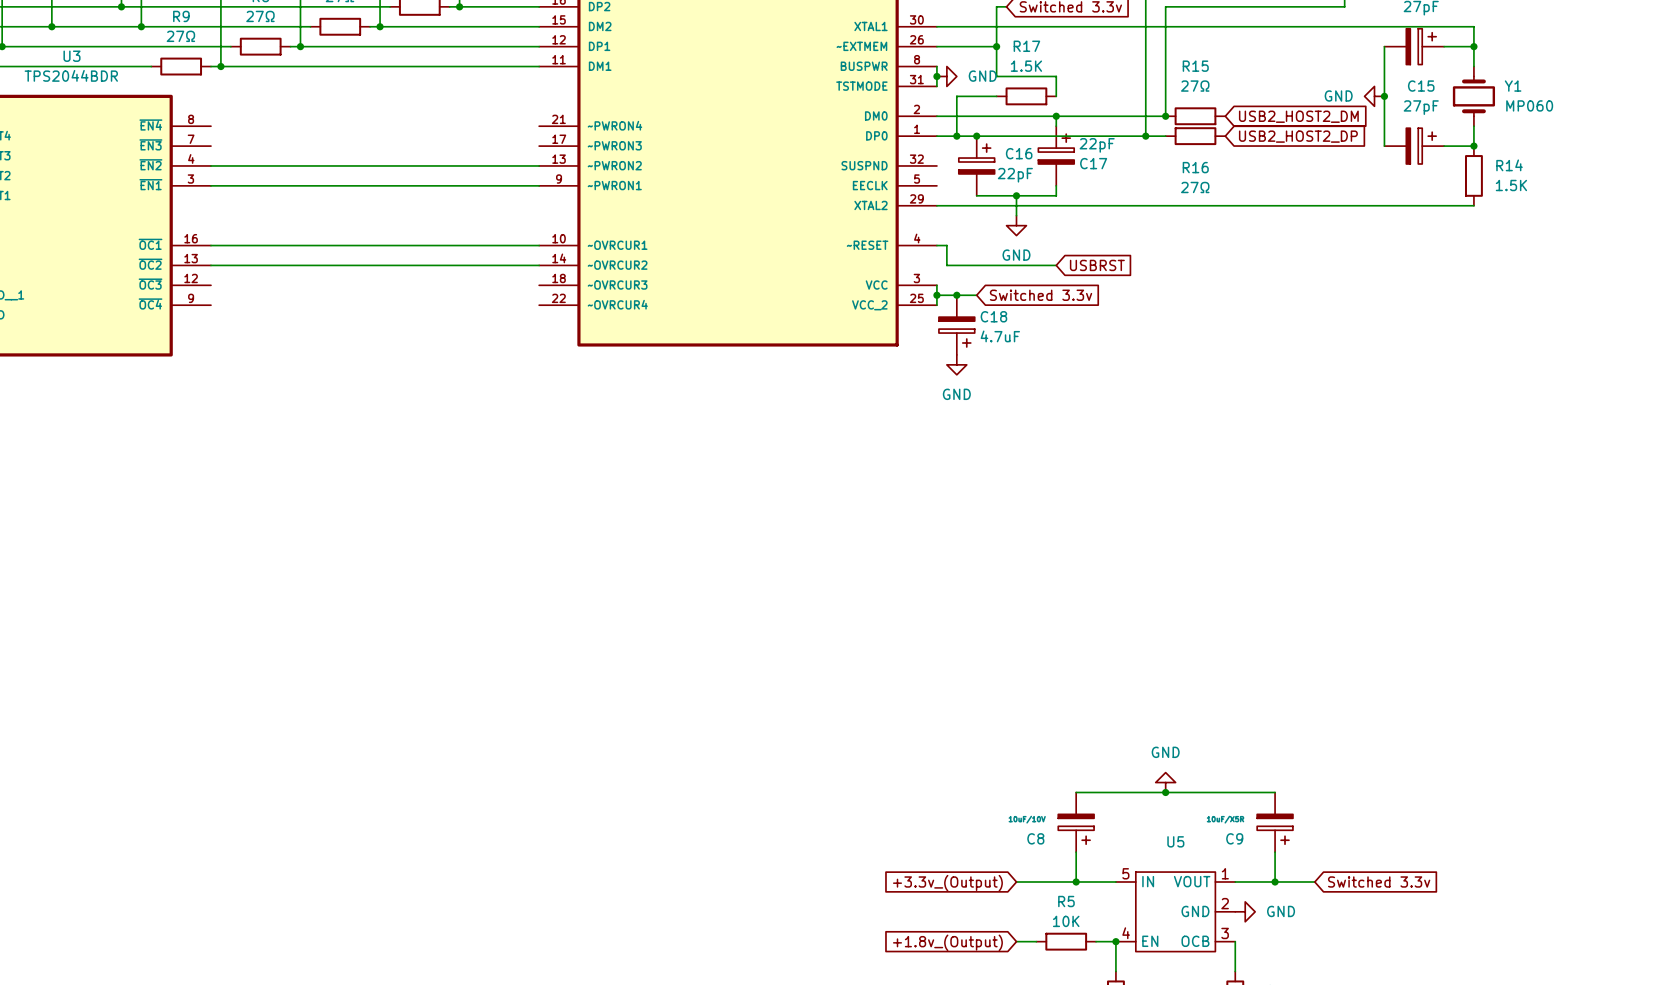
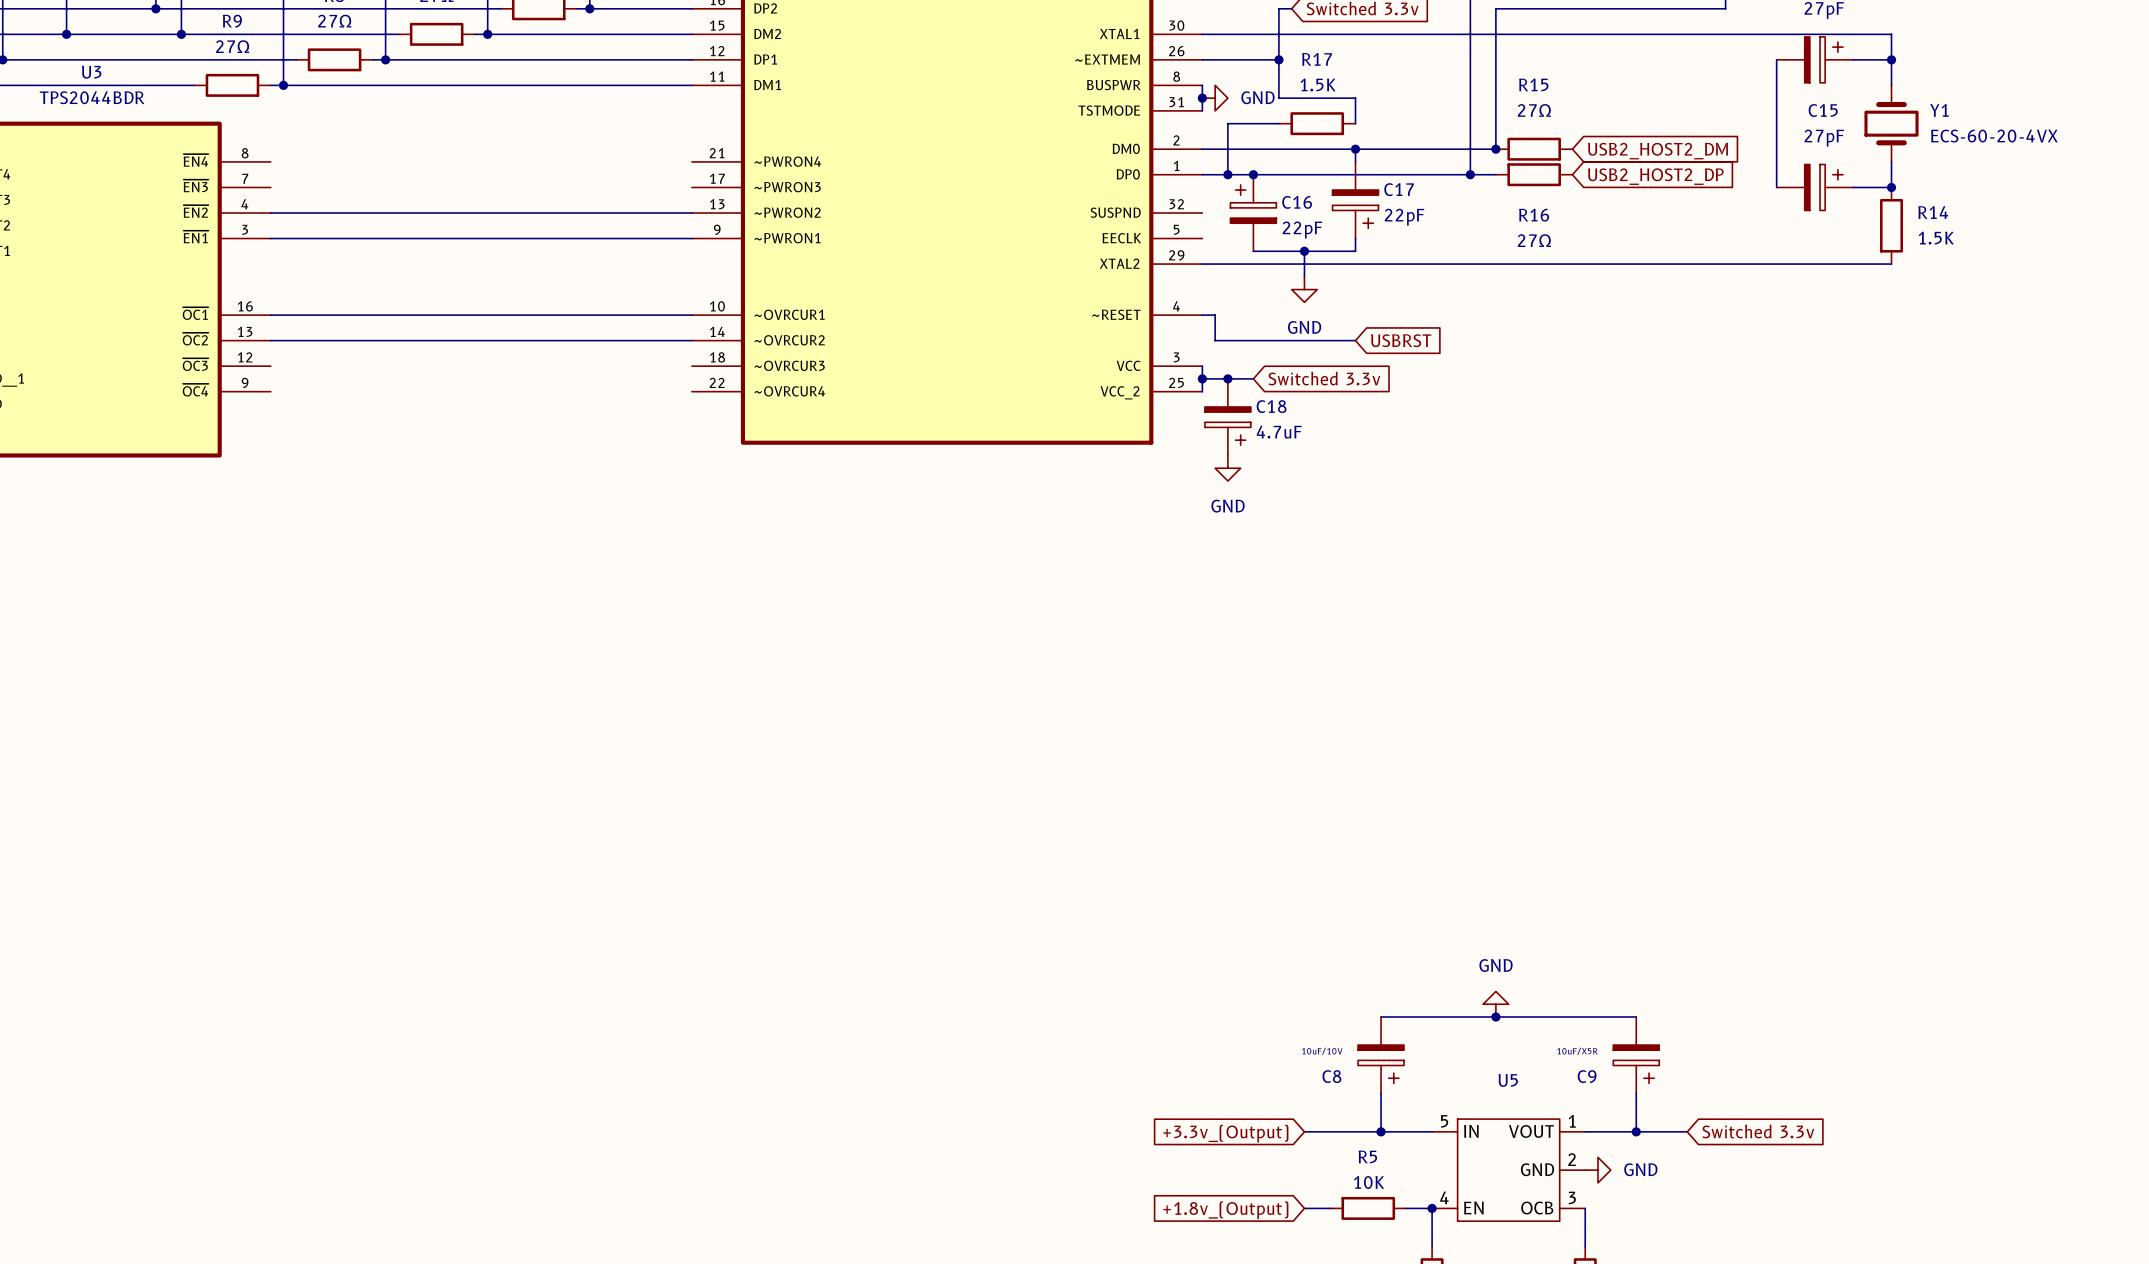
power symbol: GND (1374, 96) -> none
junction: (1384, 96) -> none
Y1 value: MP060 (1529, 105) -> ECS-60-20-4VX (1994, 136)
C17 flip: as is (1056, 149) -> up-down (1355, 209)
C16 flip: as is (976, 159) -> left-right (1253, 204)

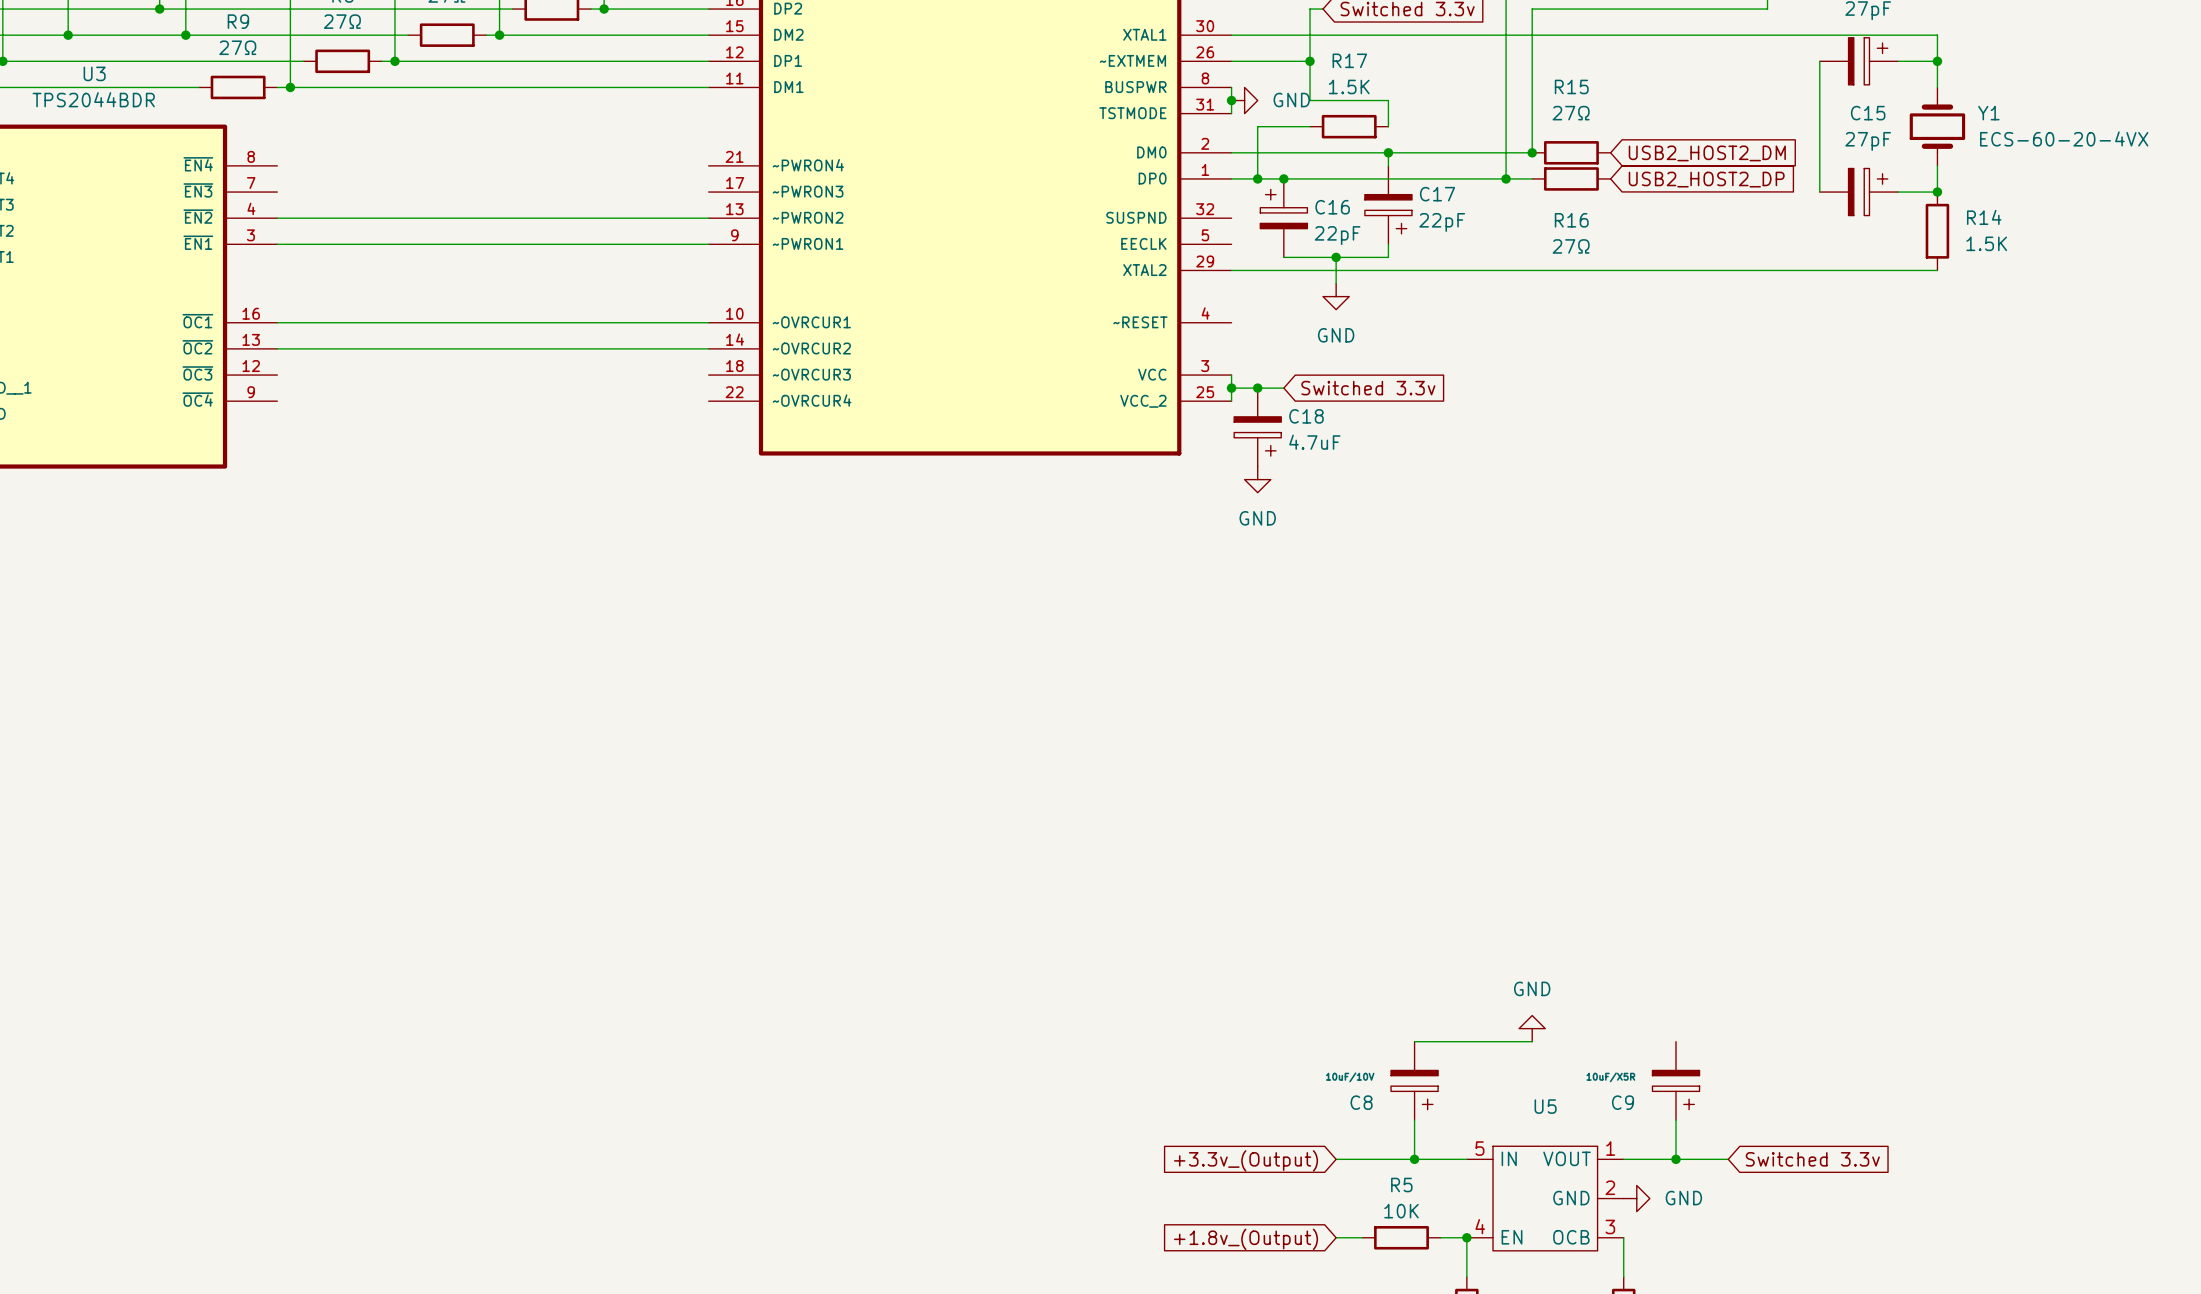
wire: (1202, 315) (1215, 315) (1215, 340) (1355, 340) -> none
global label: USBRST (1401, 340) -> none
wire: (1495, 1017) (1636, 1017) -> none
junction: (1495, 1017) -> none

